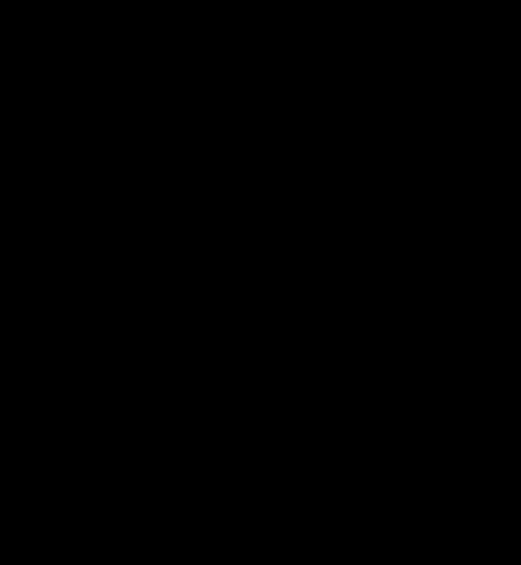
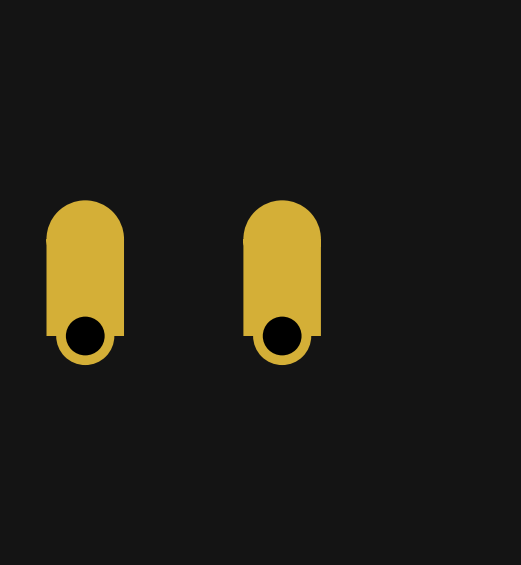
part: none -> (85, 282)
part: none -> (282, 282)

